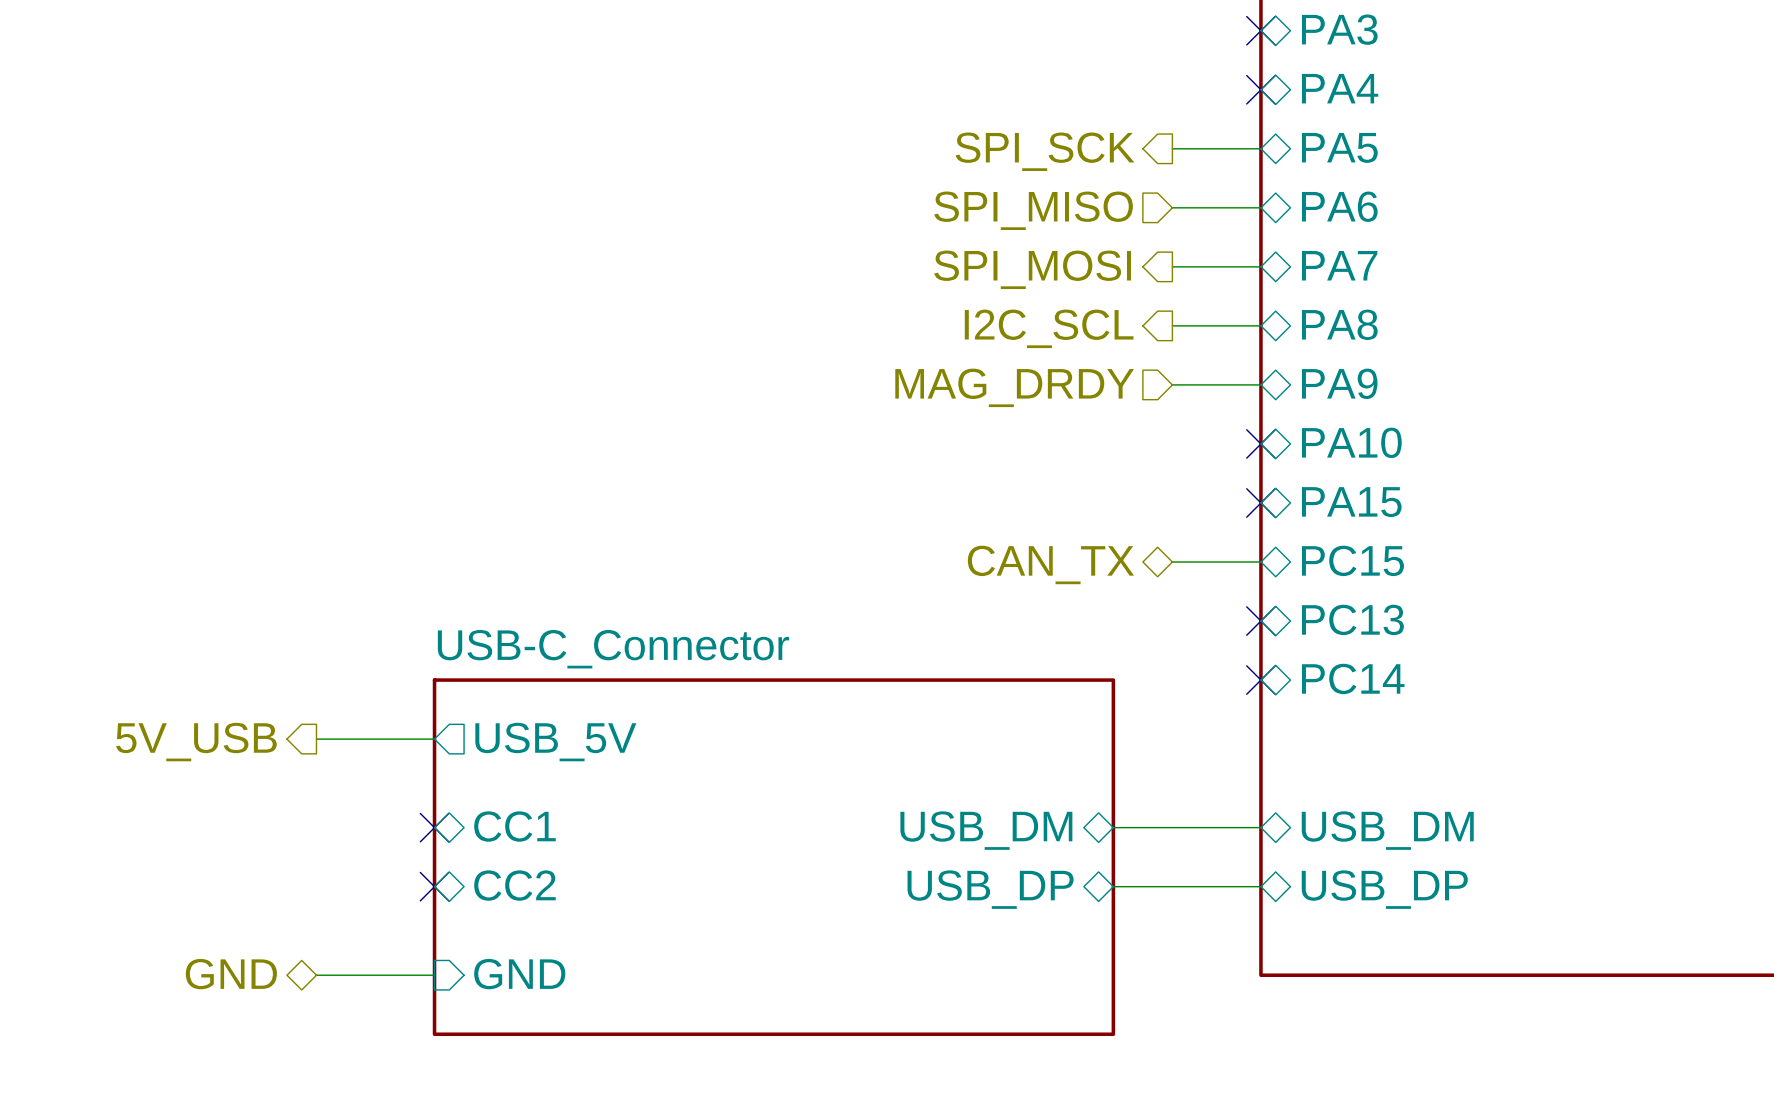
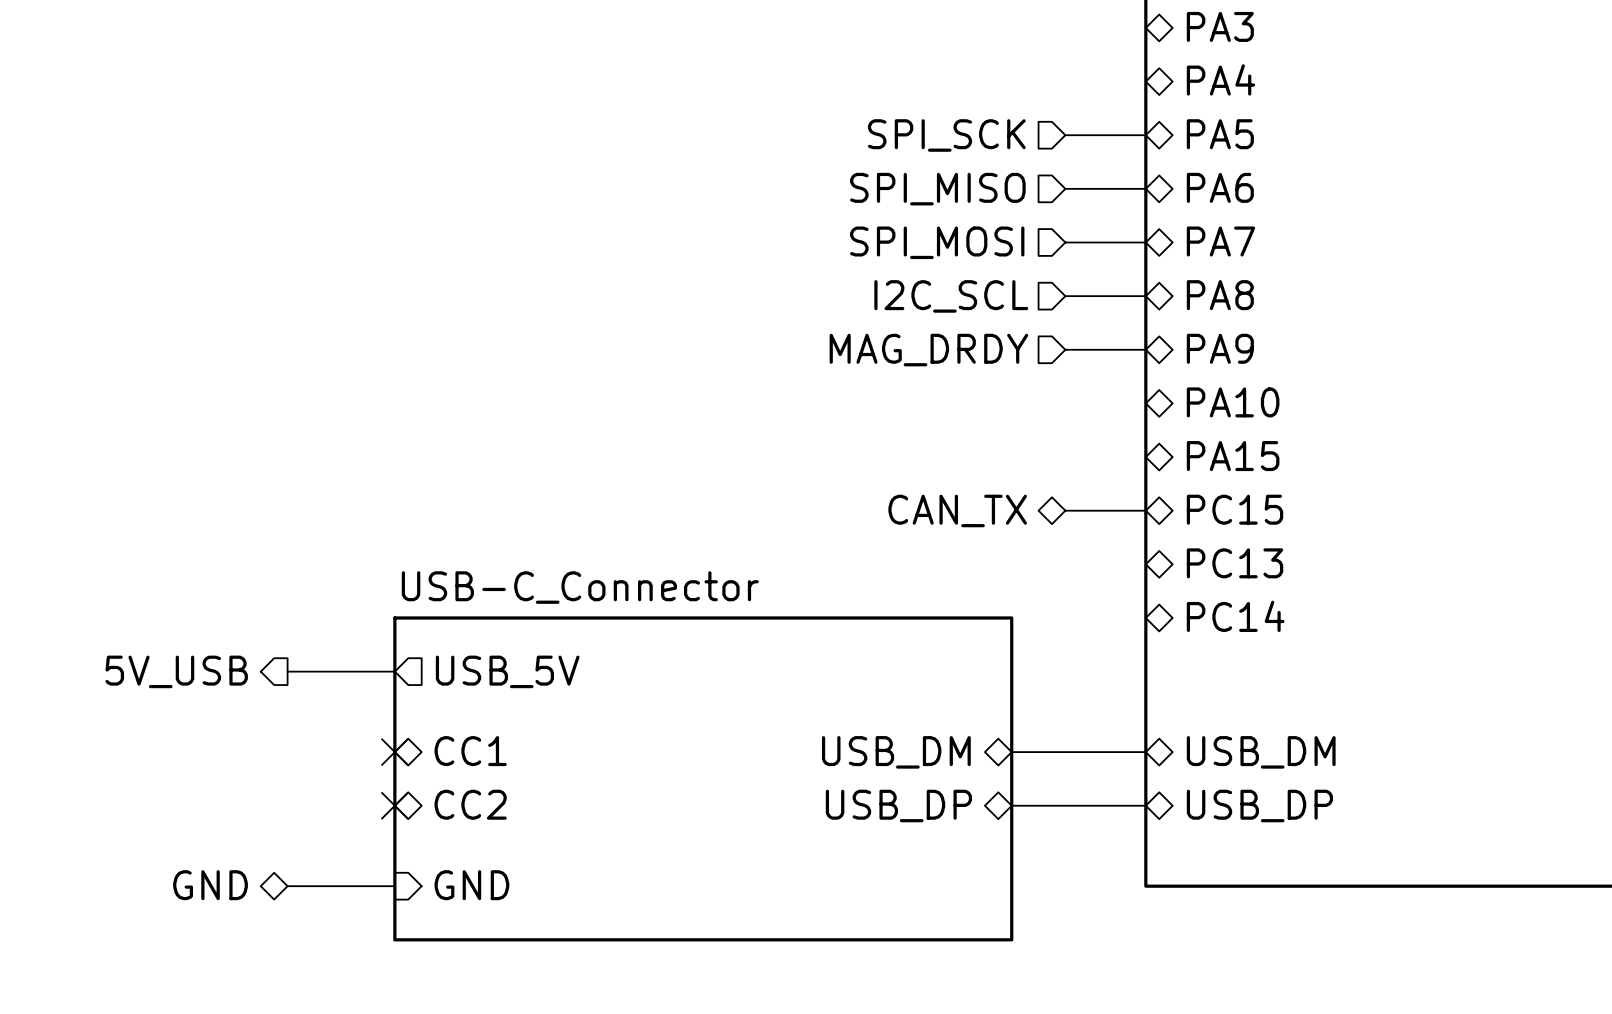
no-connect mark: (1260, 30) -> none
no-connect mark: (1260, 89) -> none
hierarchical label shape: output (1045, 151) -> input (946, 135)
hierarchical label shape: output (1032, 269) -> input (937, 242)
hierarchical label shape: output (1049, 328) -> input (951, 296)
no-connect mark: (1260, 443) -> none
no-connect mark: (1260, 502) -> none
no-connect mark: (1260, 621) -> none
no-connect mark: (1260, 680) -> none

